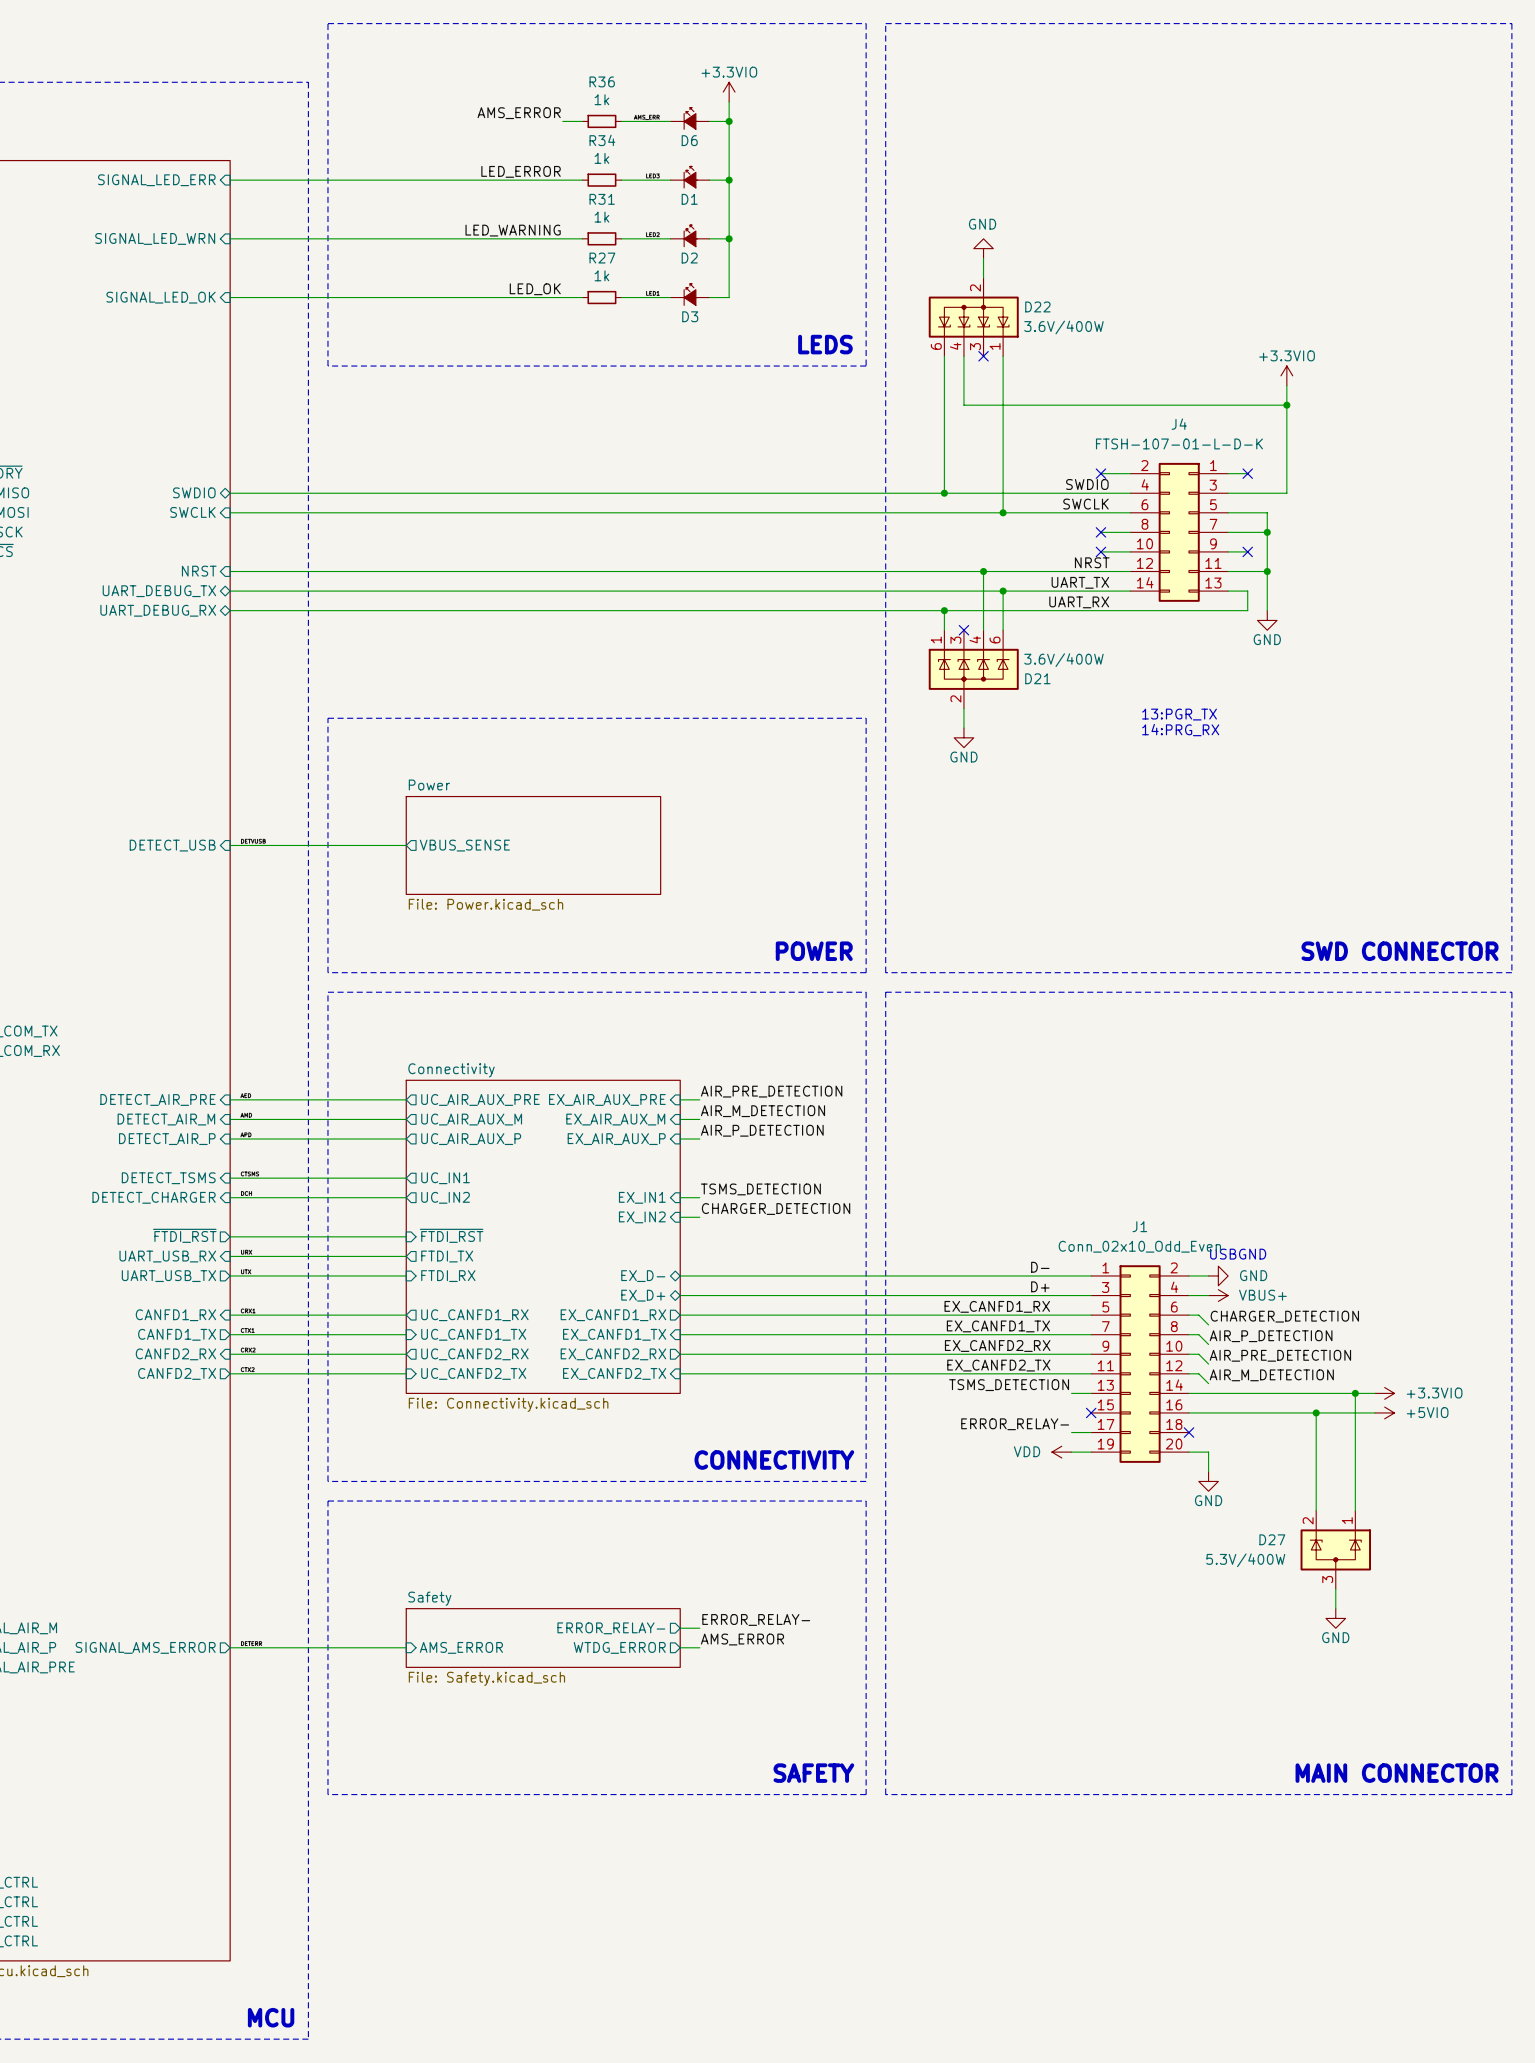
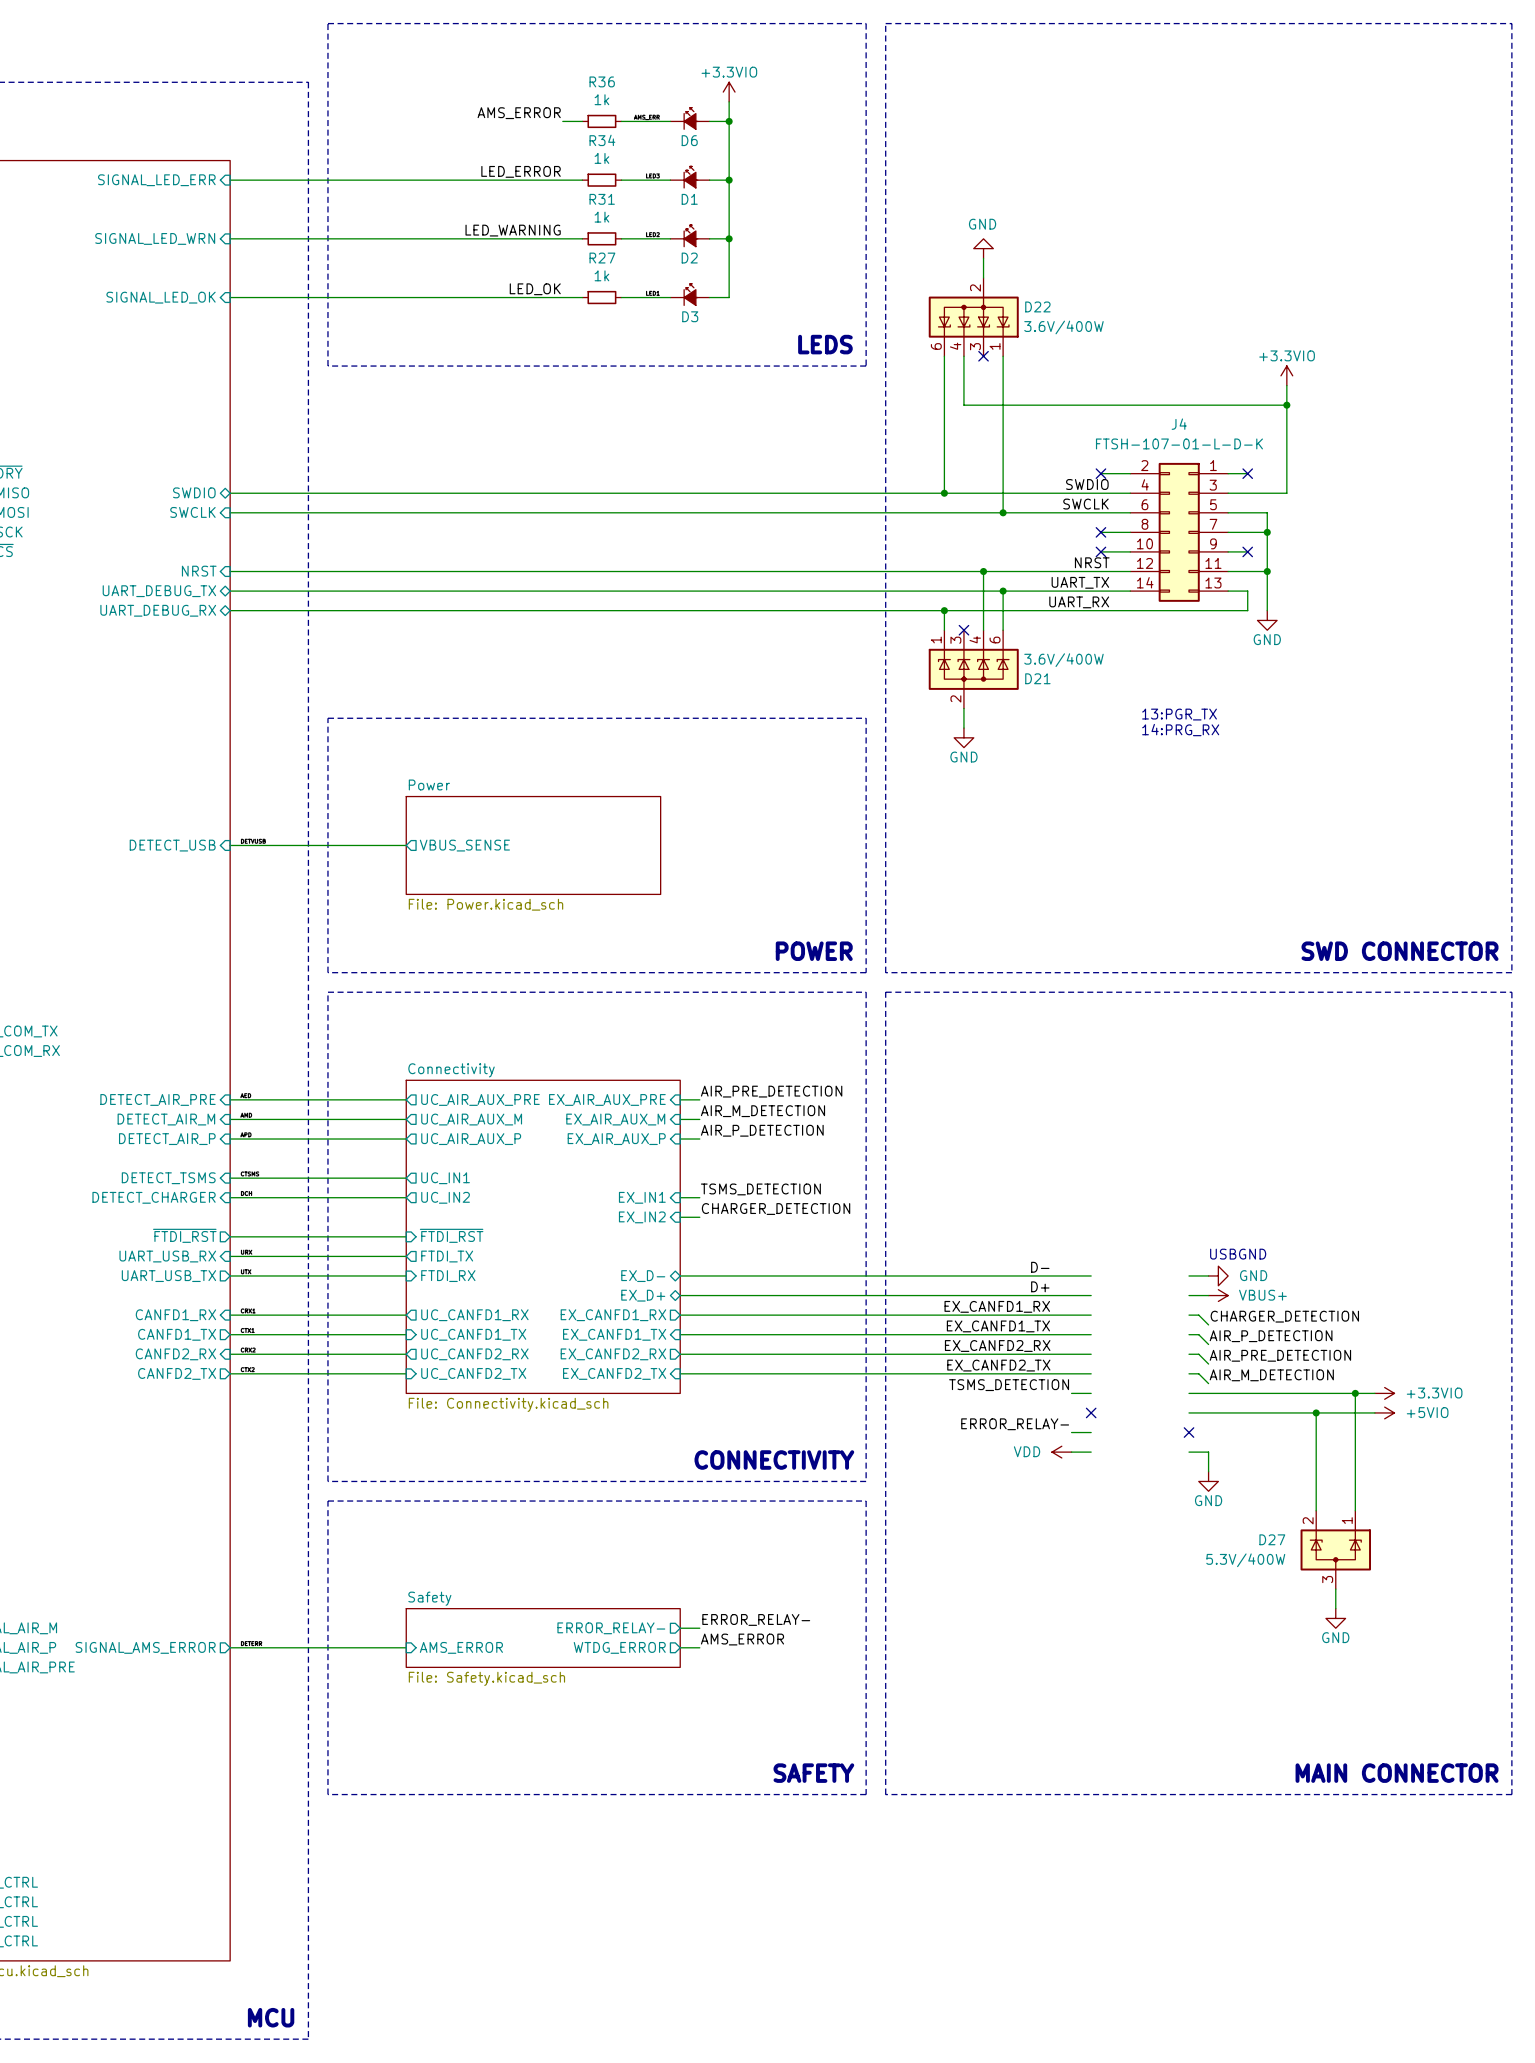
J1: Conn_02x10_Odd_Even (1140, 1364) -> none

